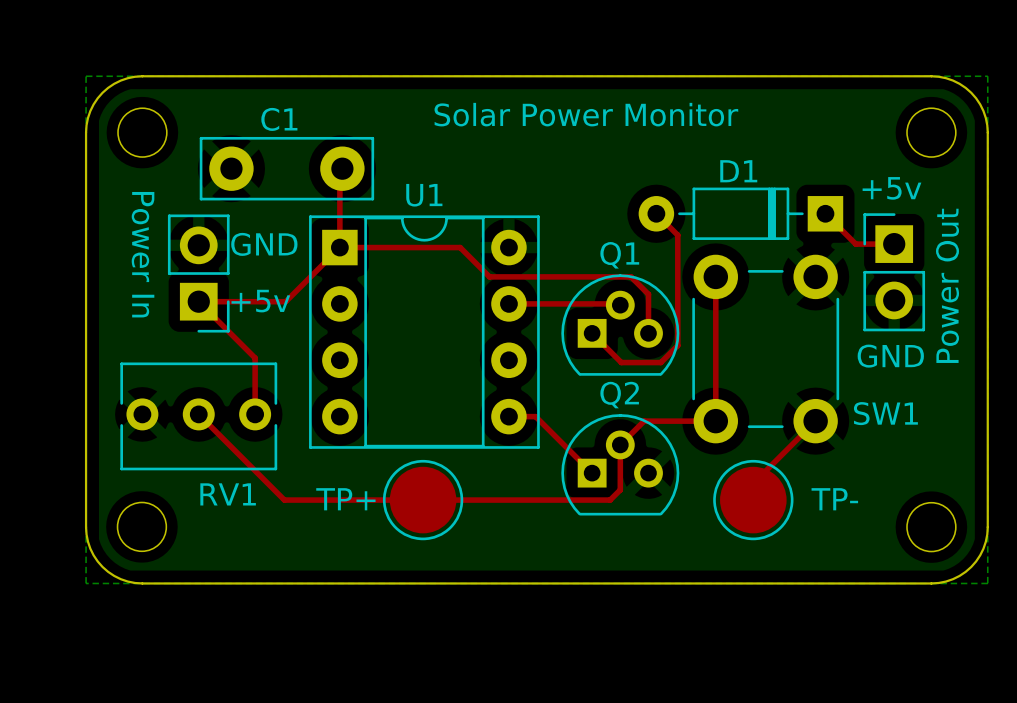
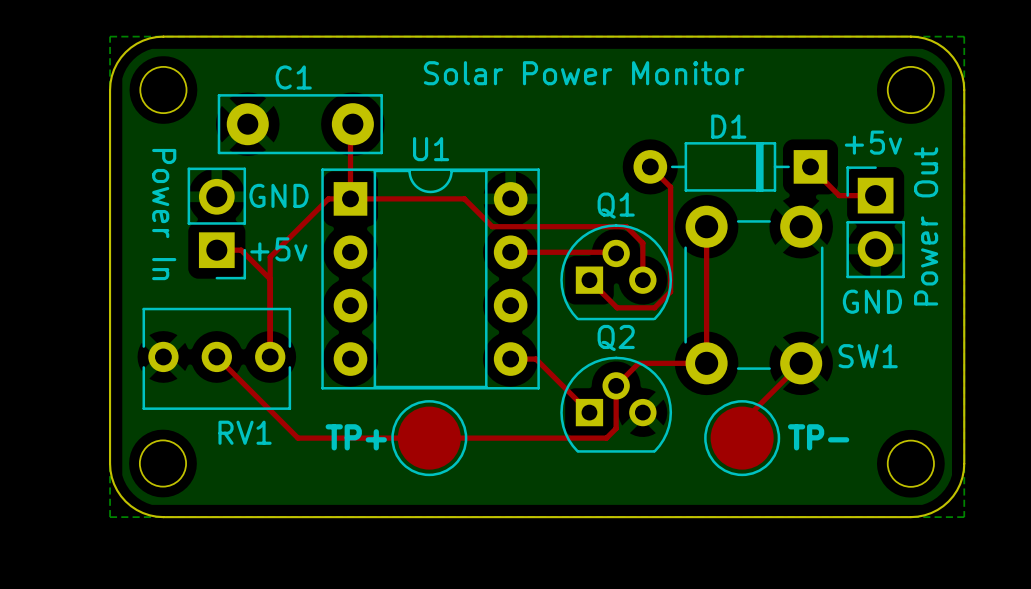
top track: (339, 247) (285, 301) (224, 301) -> (350, 198) (328, 198) (270, 257) (270, 303)
top track: (198, 301) (255, 358) -> none
top track: none -> (241, 250) (270, 279)

